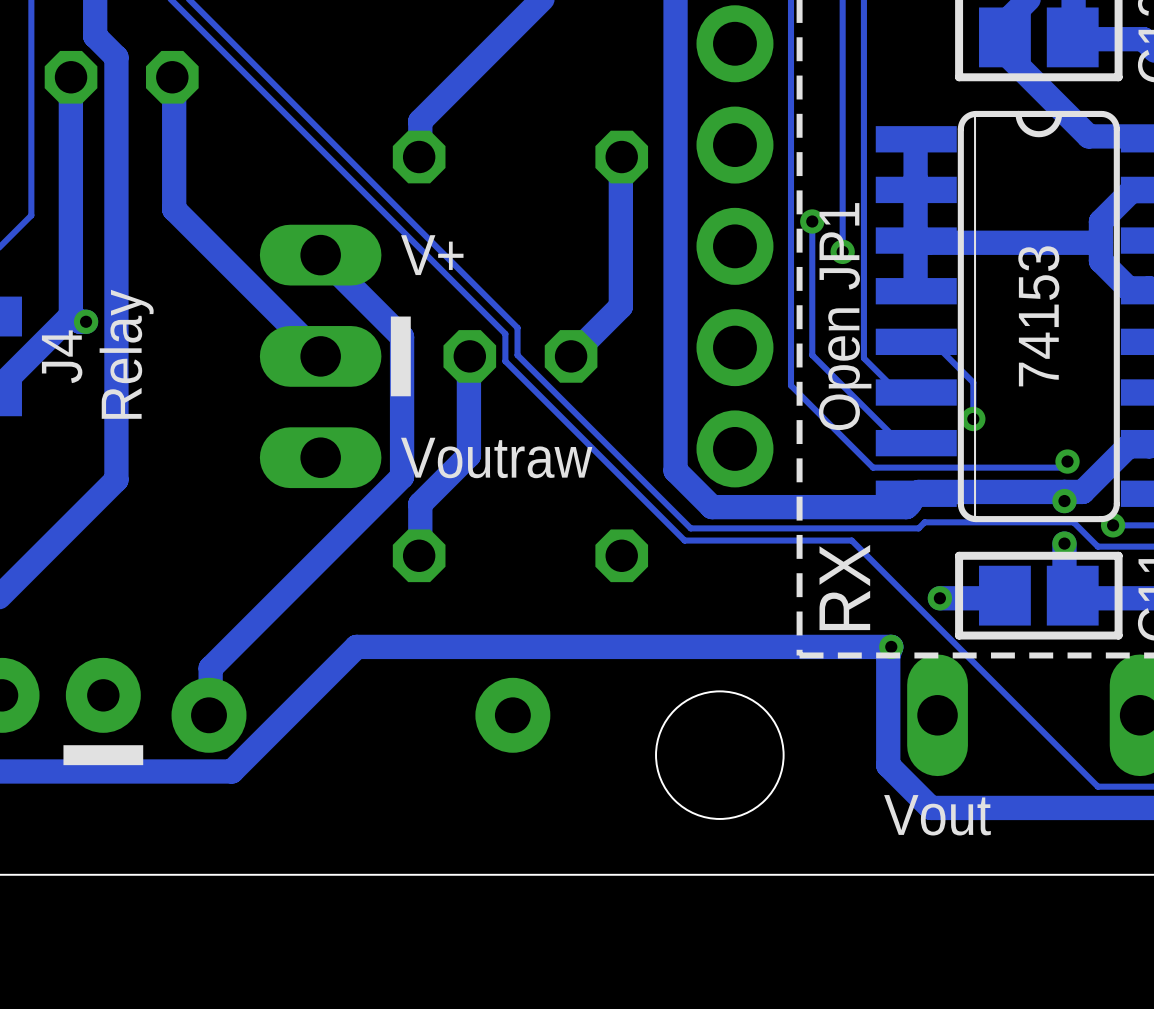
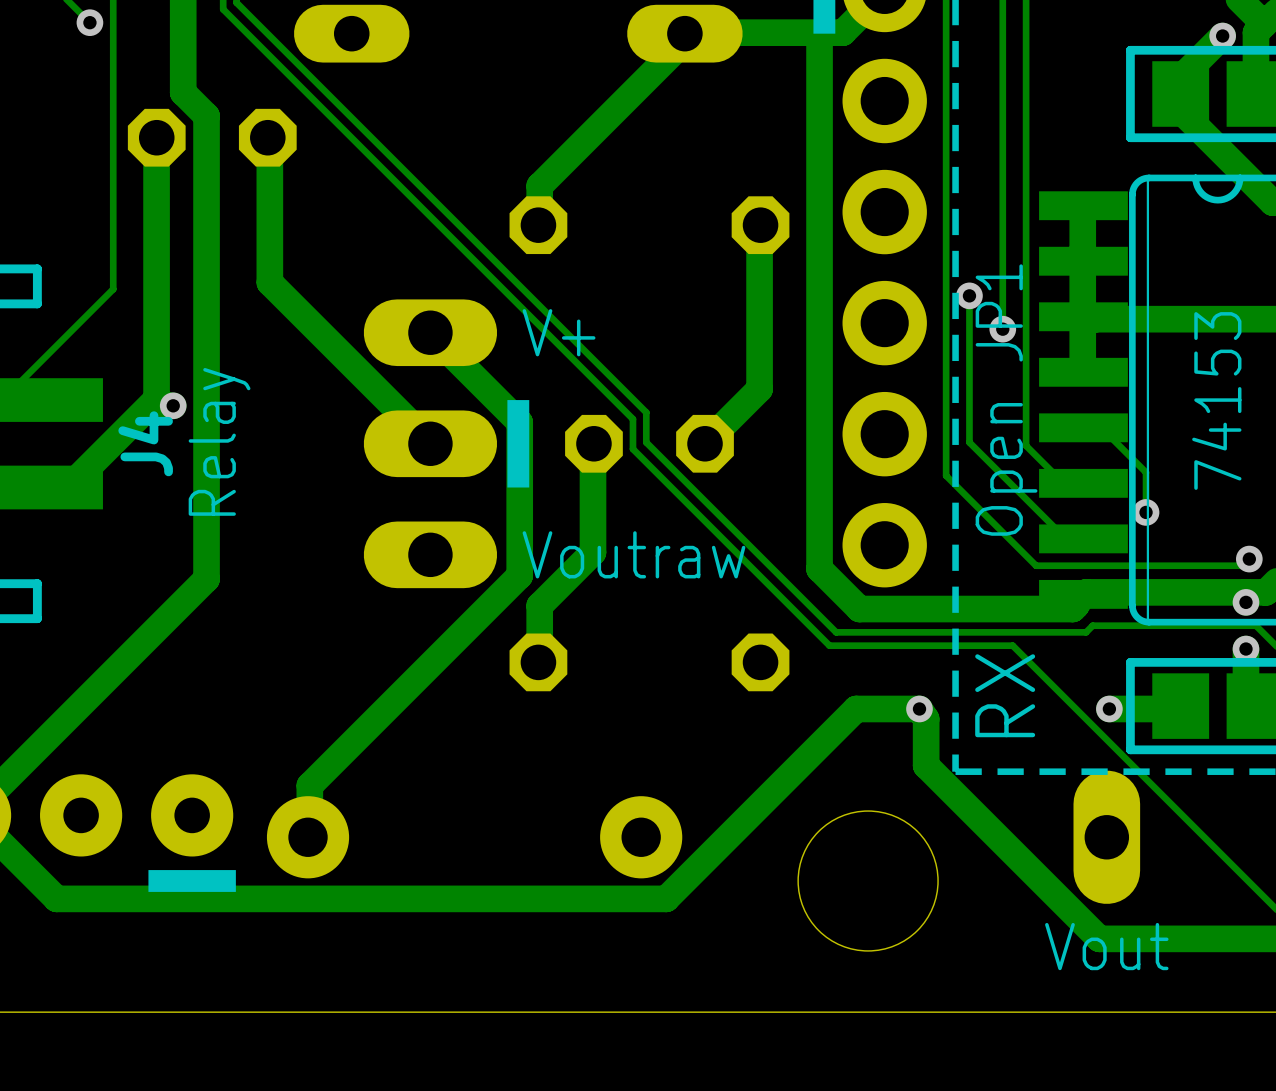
via position: (891, 646) -> (919, 708)
track: (888, 765) (888, 656) (891, 646) (356, 646) (231, 771) -> (1052, 892) (926, 765) (926, 718) (919, 708) (856, 708) (666, 898) (333, 898)

